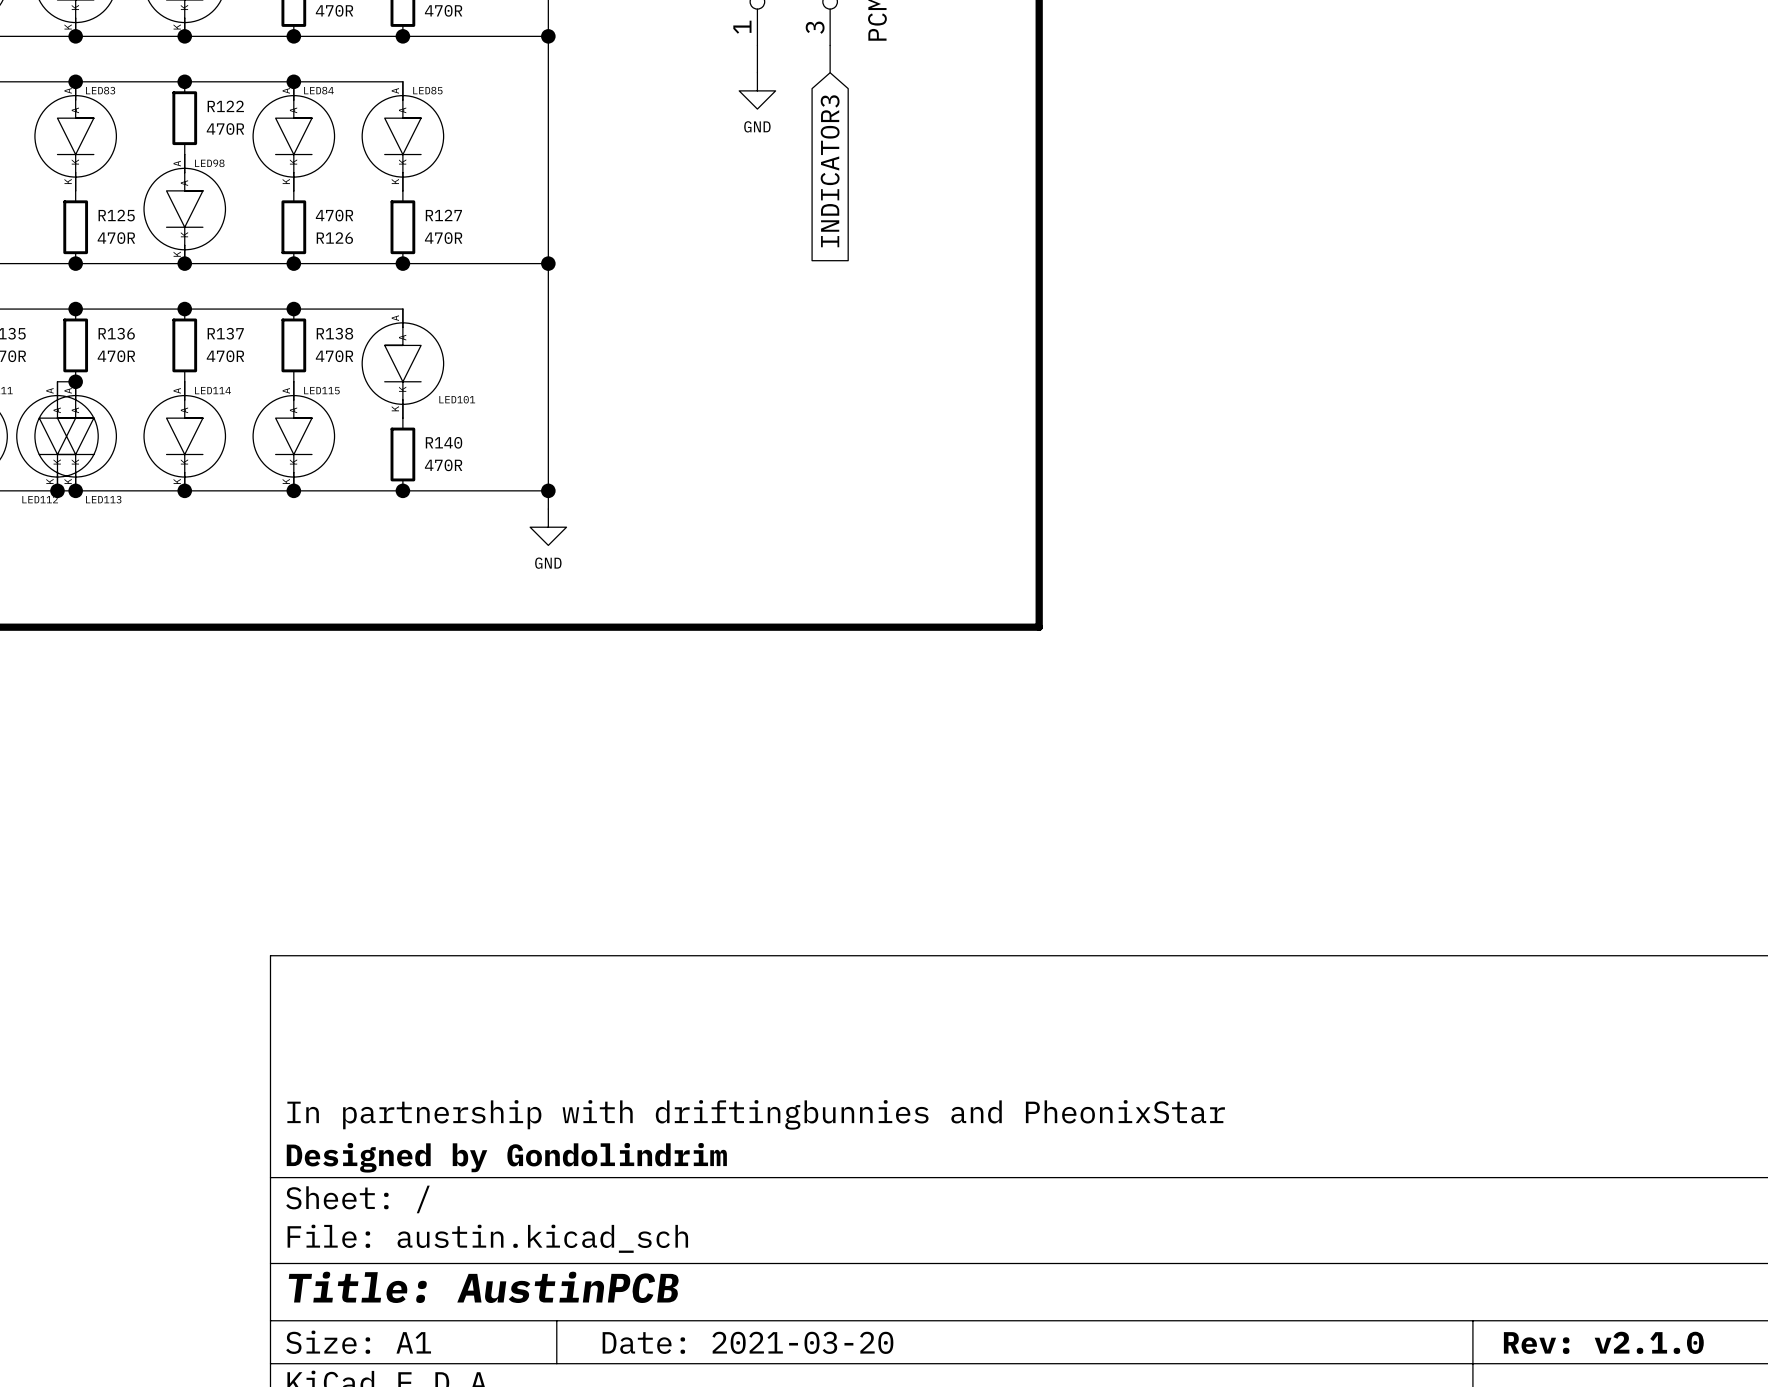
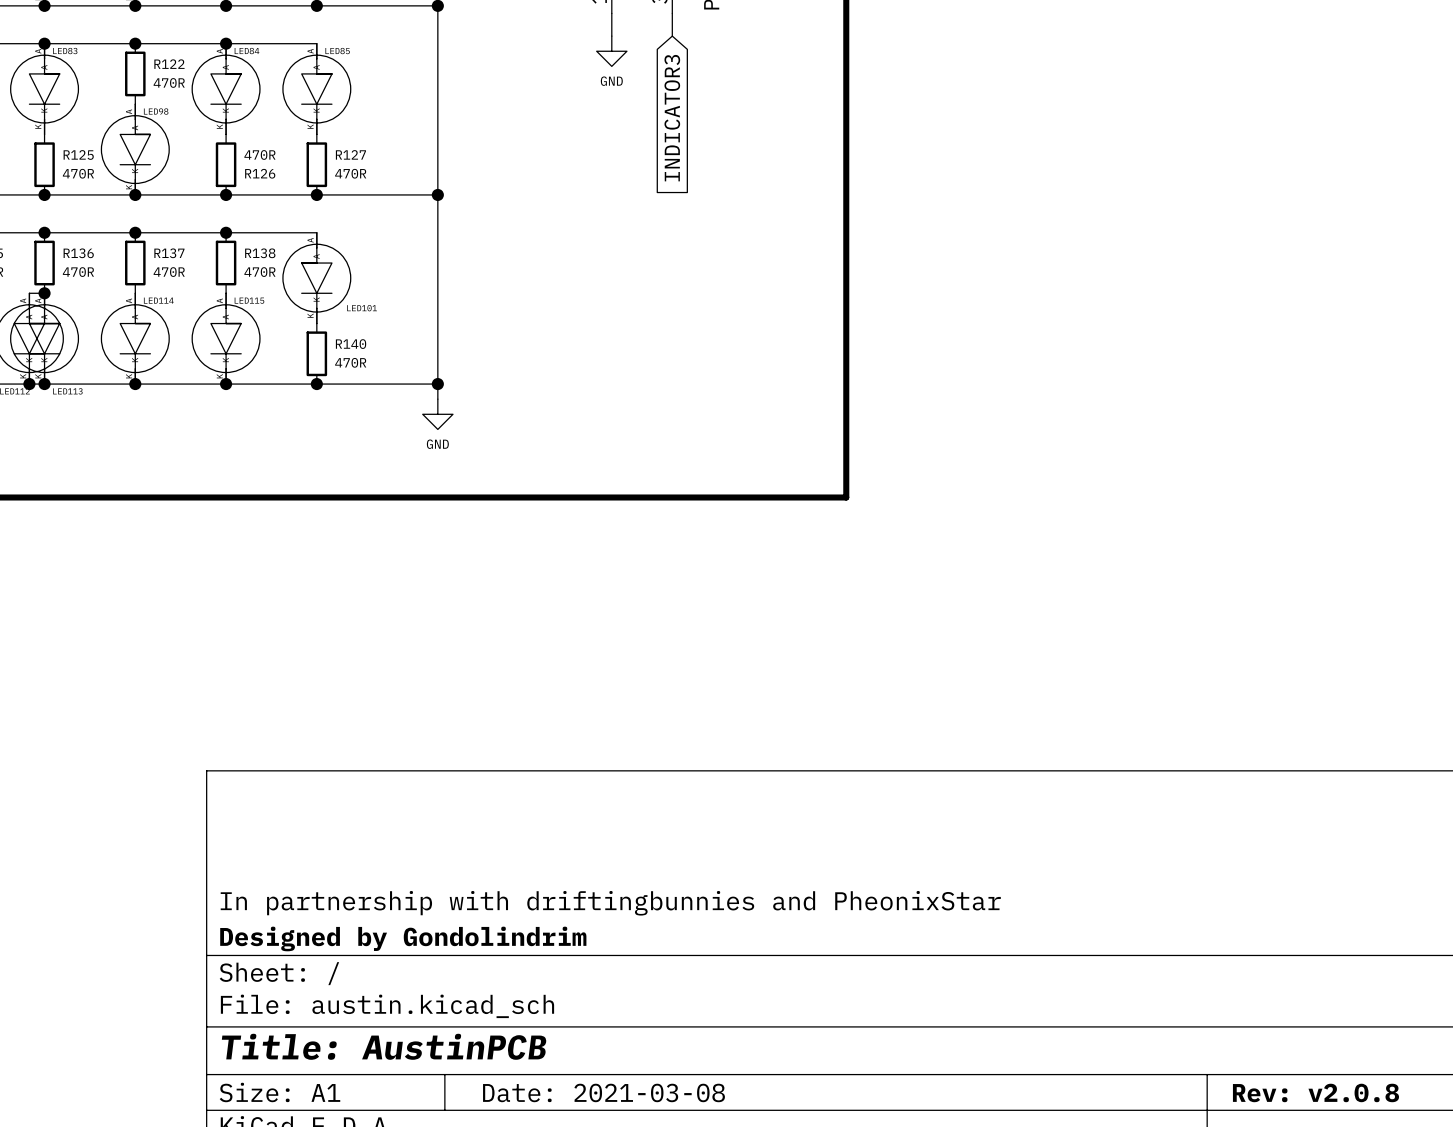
title block: Date: 2021-03-20 (748, 1342) -> Date: 2021-03-08 (603, 1092)
title block: Rev: v2.1.0 (1603, 1342) -> Rev: v2.0.8 (1315, 1092)

